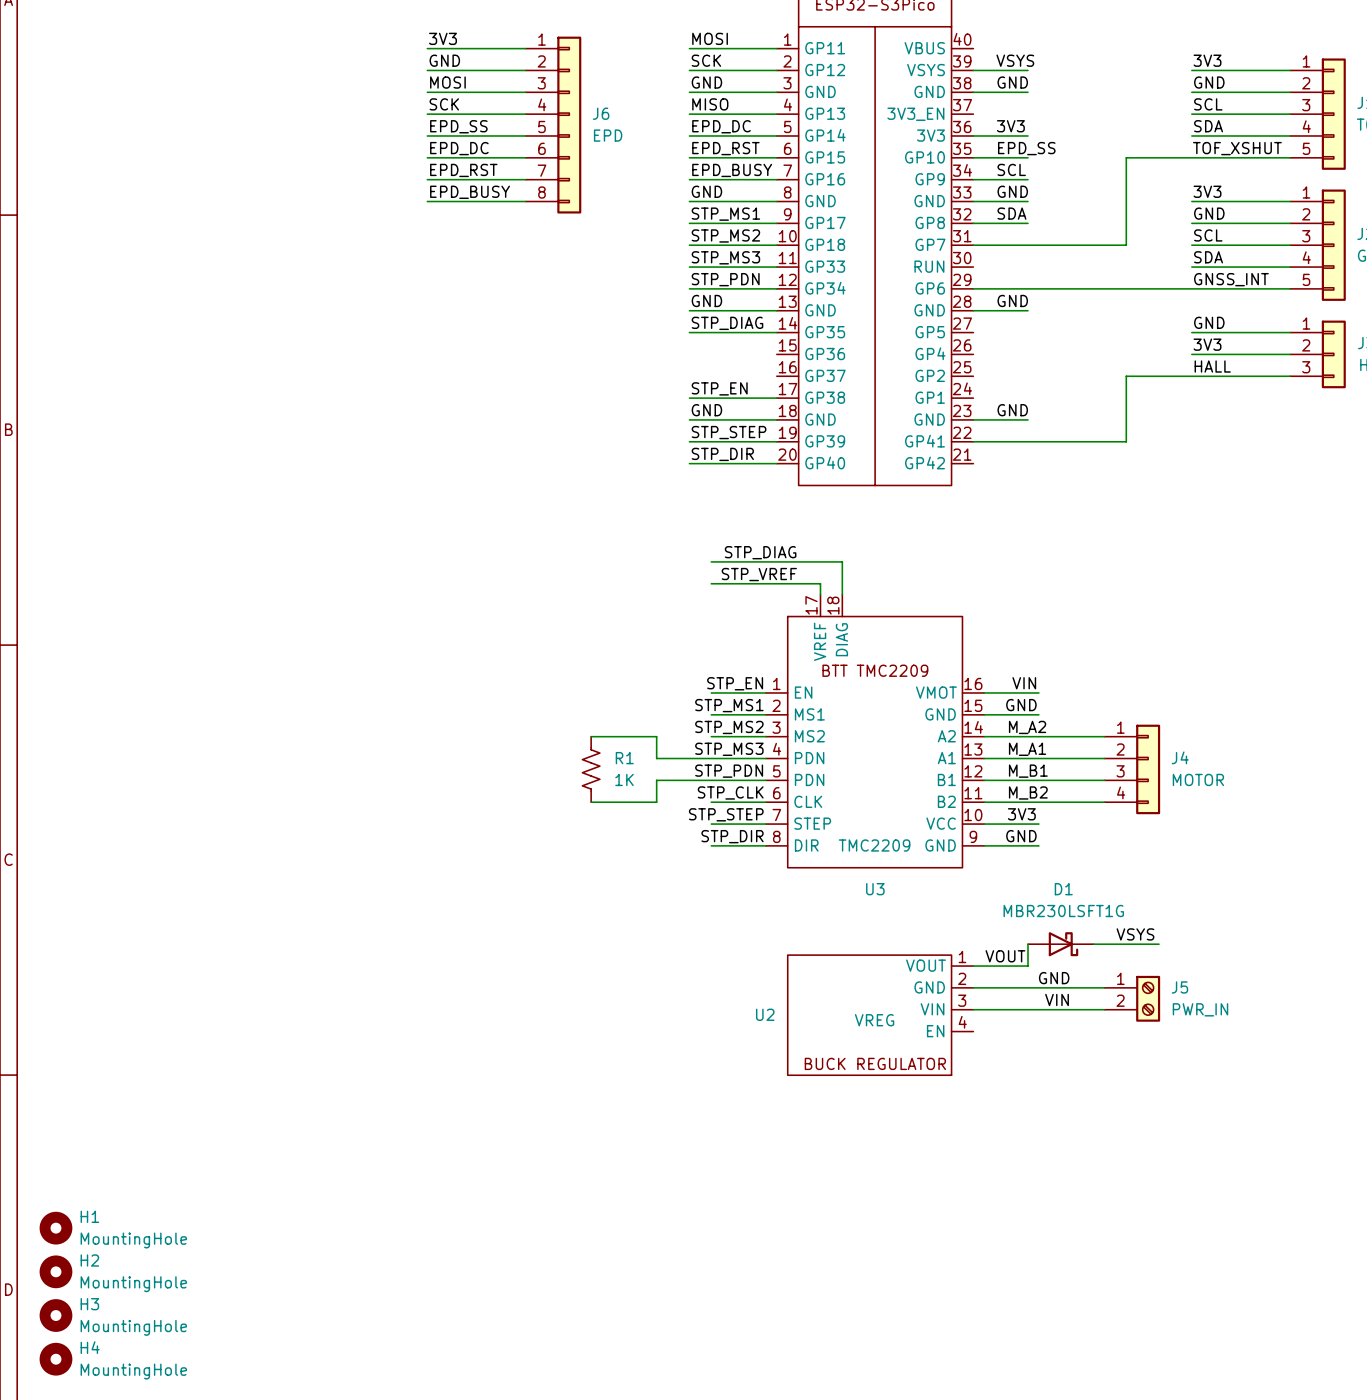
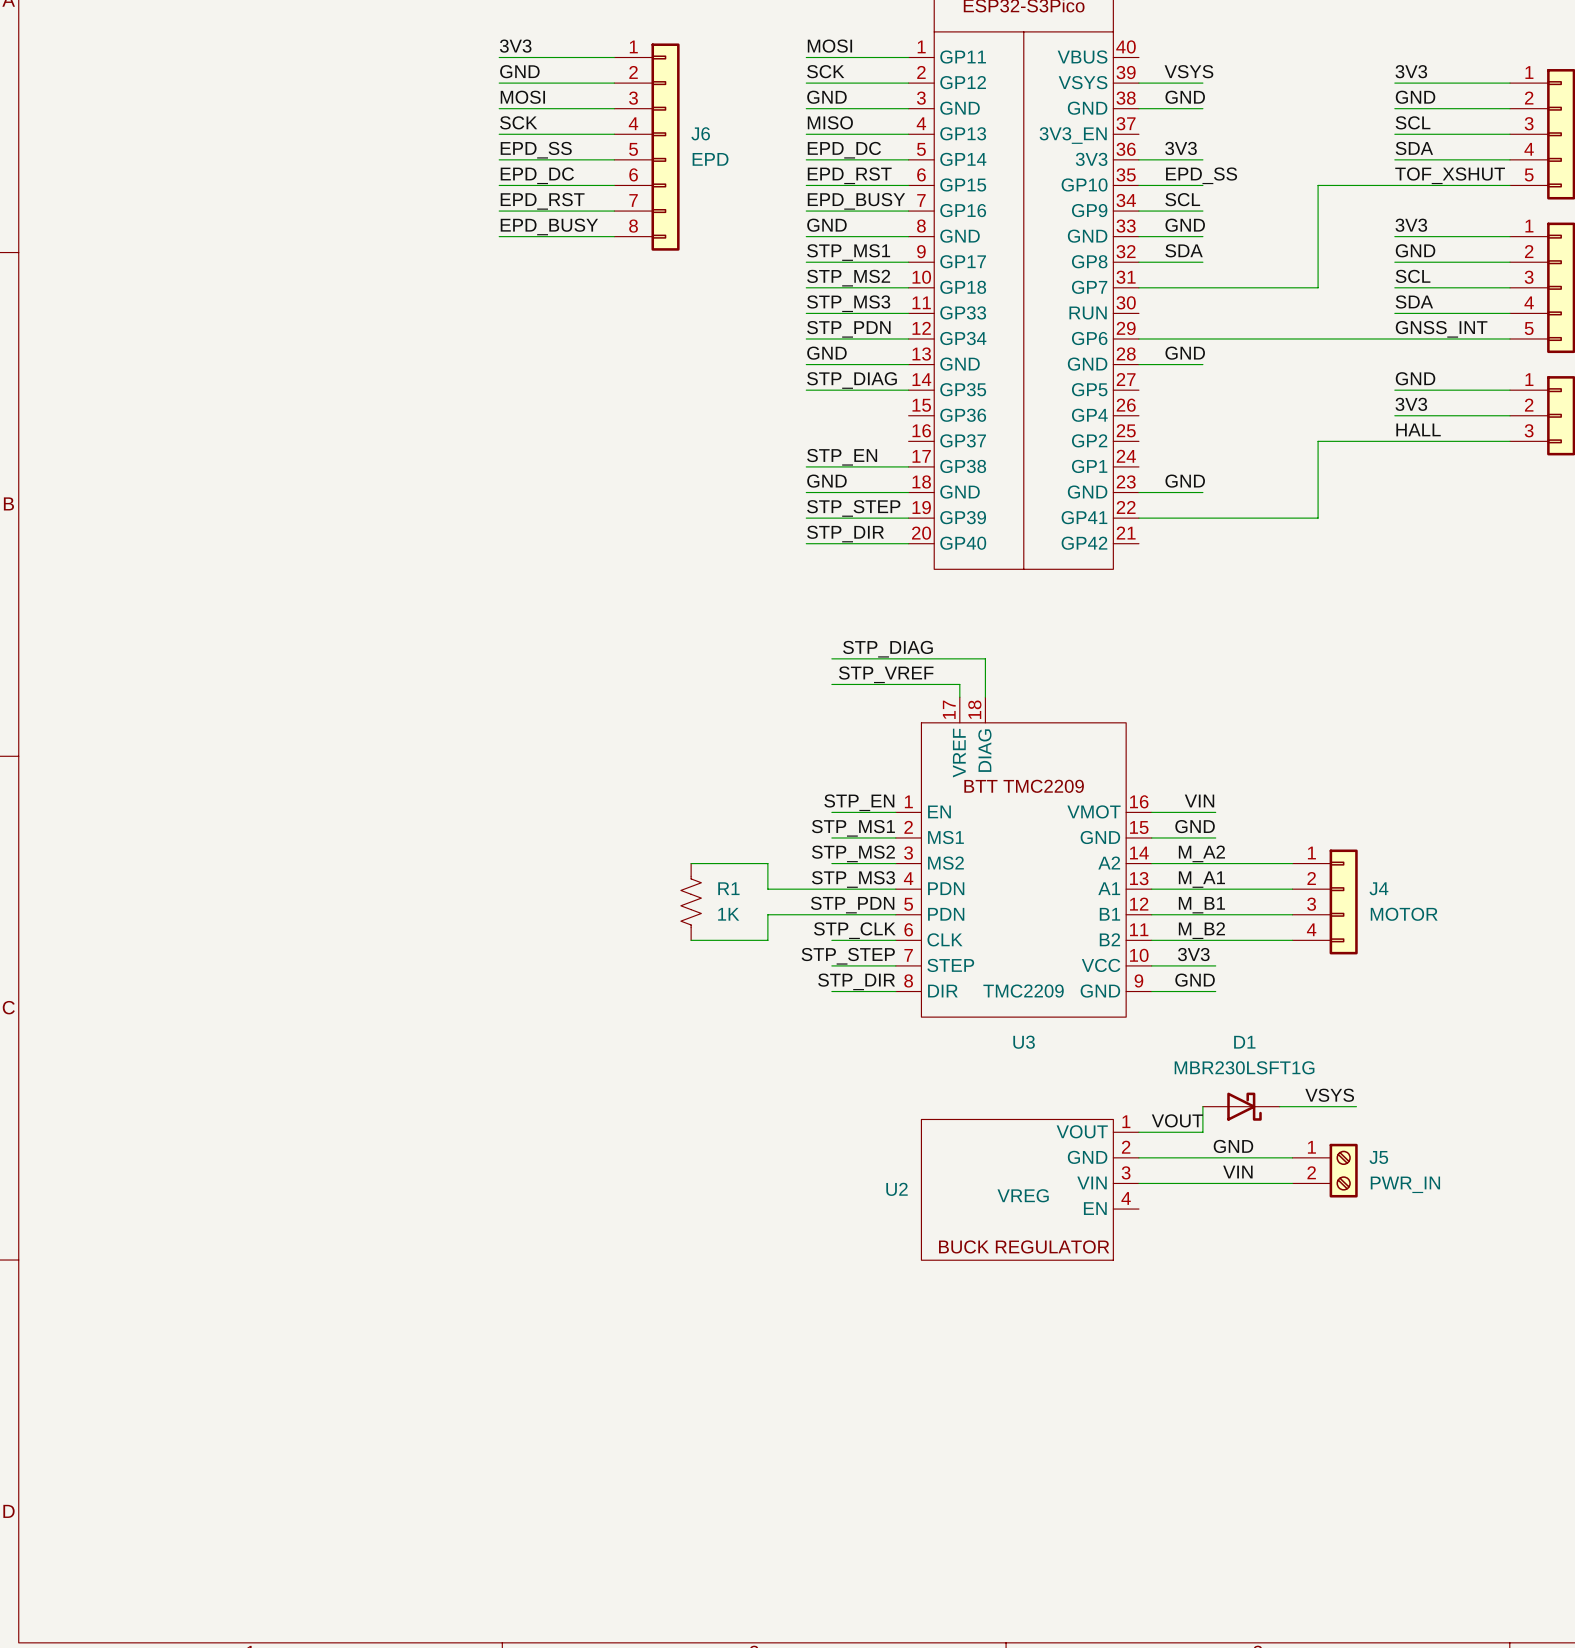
H1: MountingHole (55, 1228) -> none
H2: MountingHole (55, 1271) -> none
H3: MountingHole (55, 1315) -> none
H4: MountingHole (55, 1359) -> none

